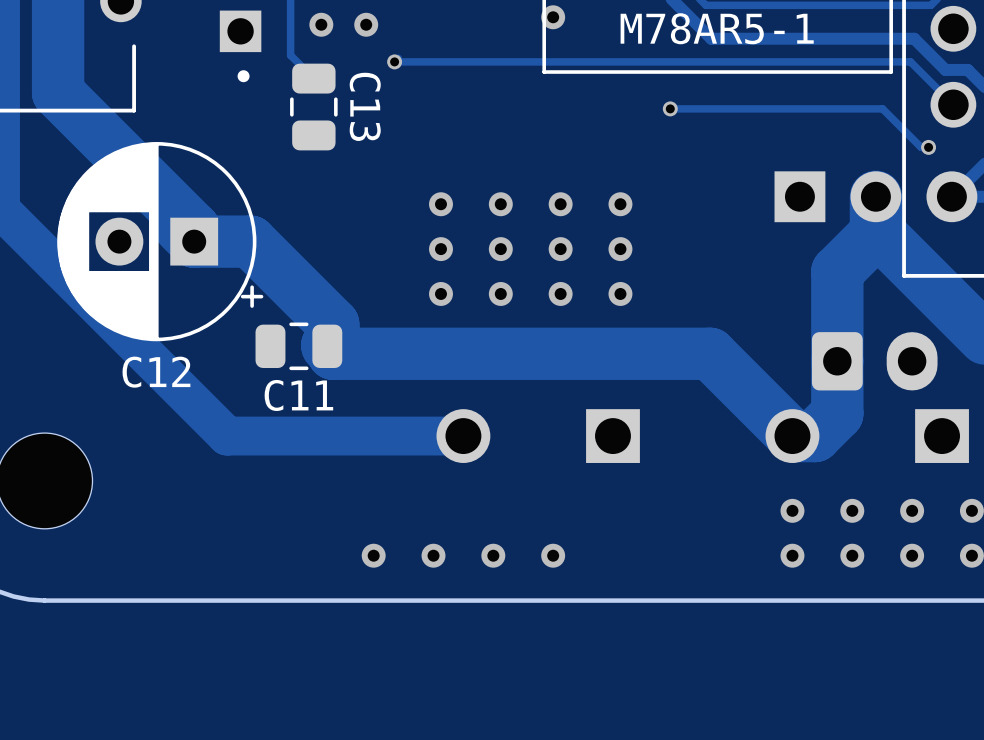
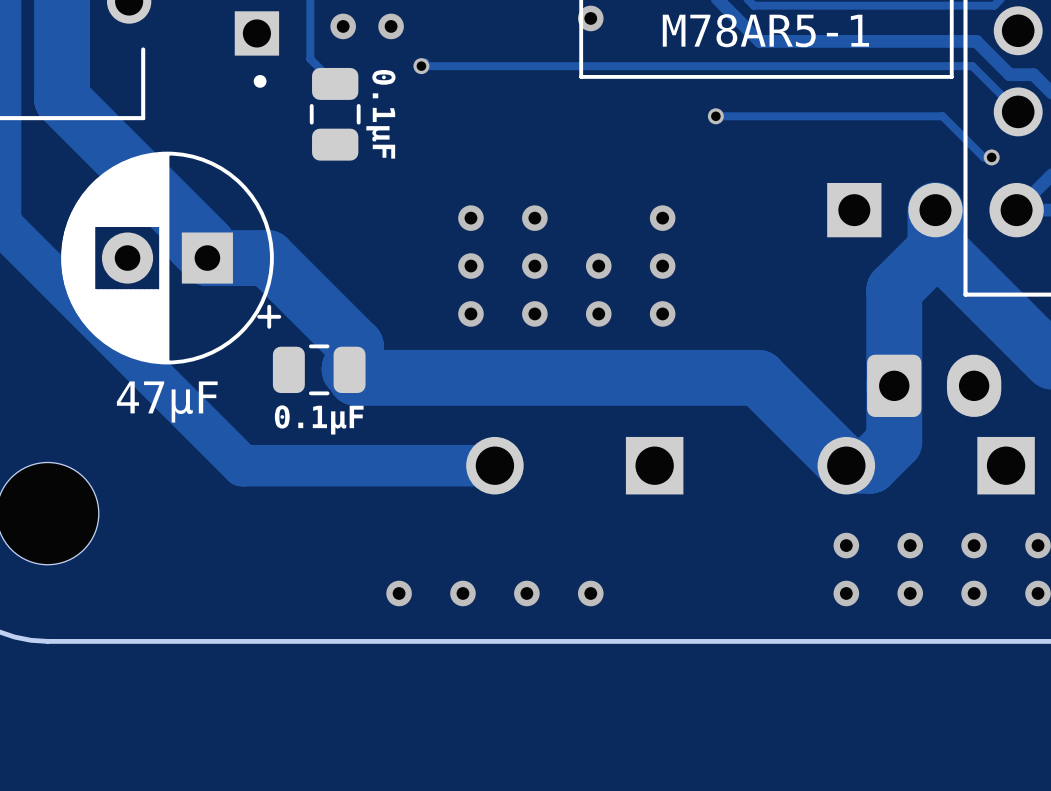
C13 name: C13 (365, 106) -> none
text: none -> 0.1μF (380, 114)
via: (560, 204) -> none
C12 name: C12 (156, 372) -> 47μF (167, 402)
text: none -> 0.1μF (319, 419)
C11 name: C11 (298, 395) -> none

